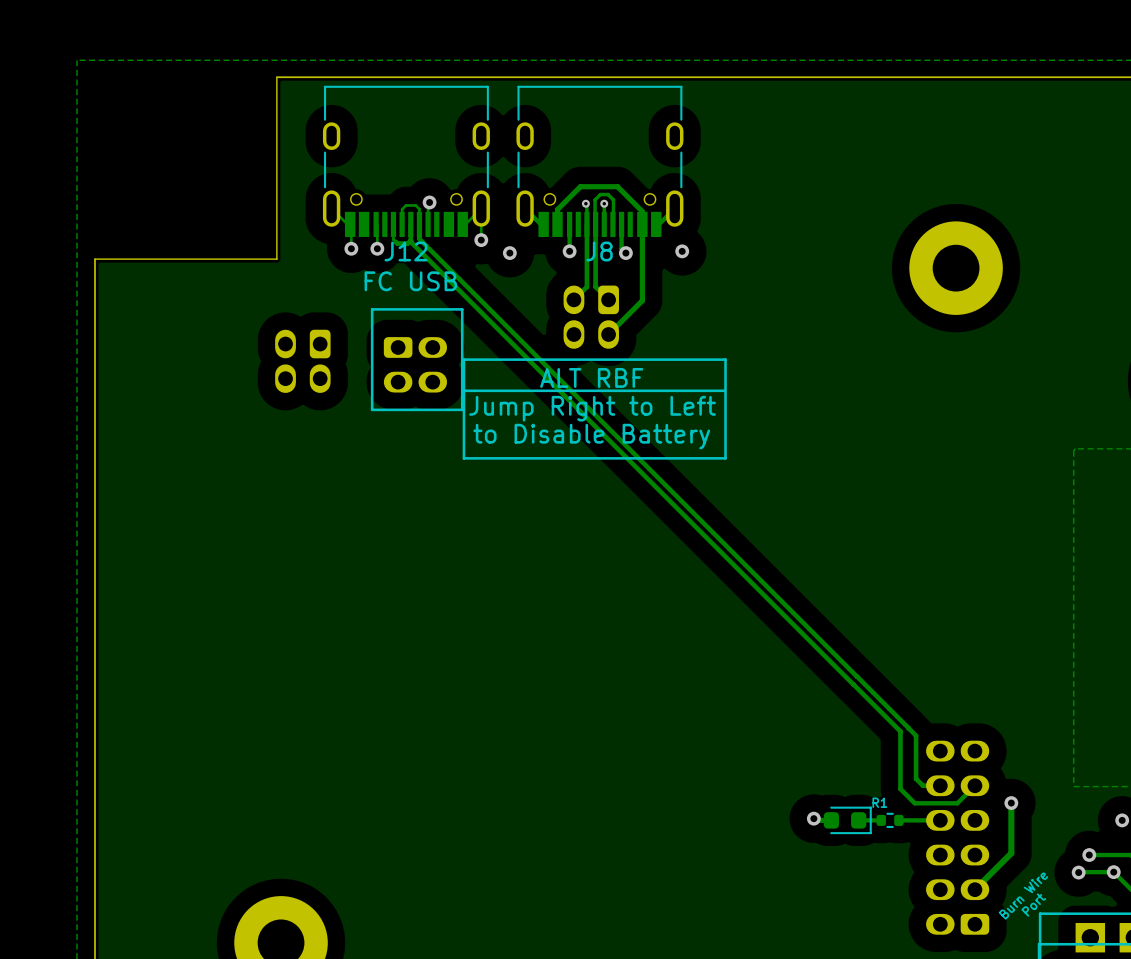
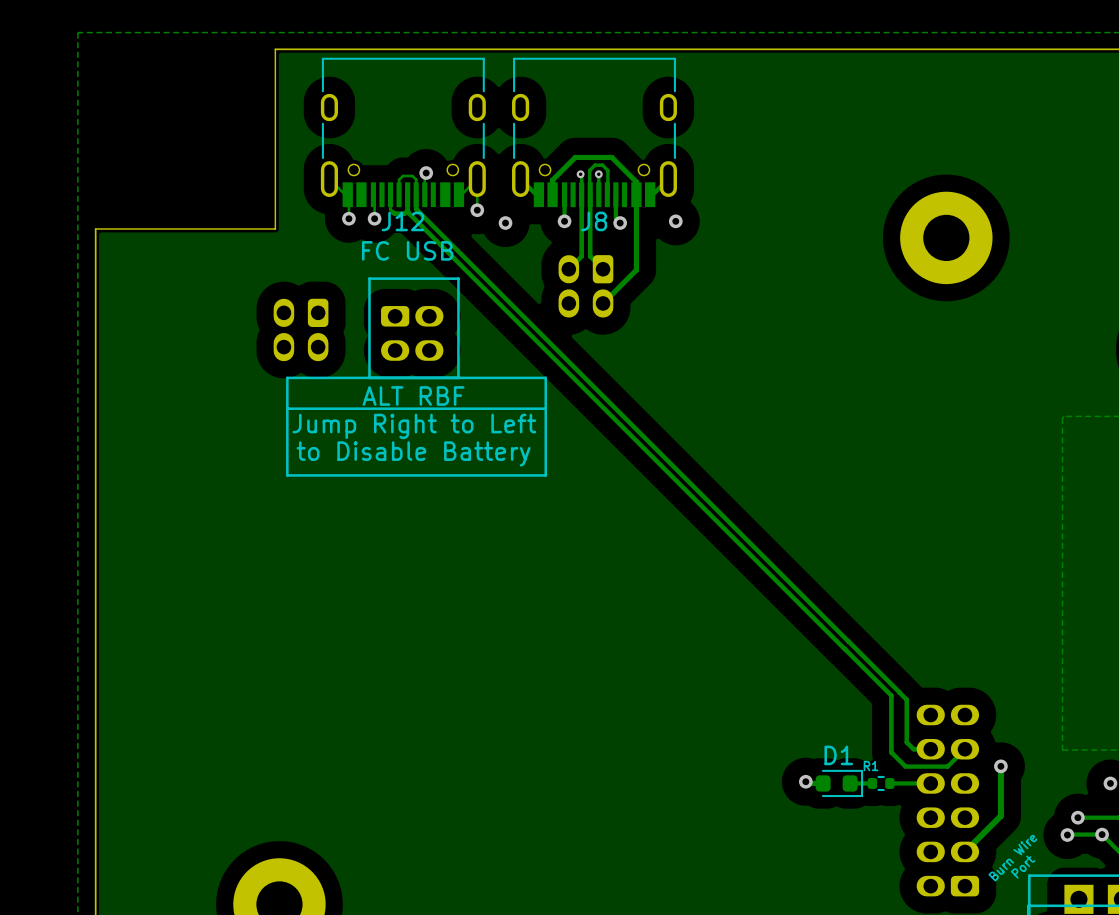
line: (725, 359) (463, 359) (463, 458) (725, 458) (725, 359) -> none
text position: ALT RBF (591, 377) -> ALT RBF (413, 395)
line: (723, 390) (463, 390) -> (544, 408) (287, 408)
text position: Jump Right to Left (592, 408) -> Jump Right to Left (414, 426)
line: none -> (458, 377) (545, 377) (545, 475) (287, 475) (287, 377) (369, 377)
text position: to Disable Battery (591, 436) -> to Disable Battery (413, 453)
D1 name: none -> D1 (838, 755)

